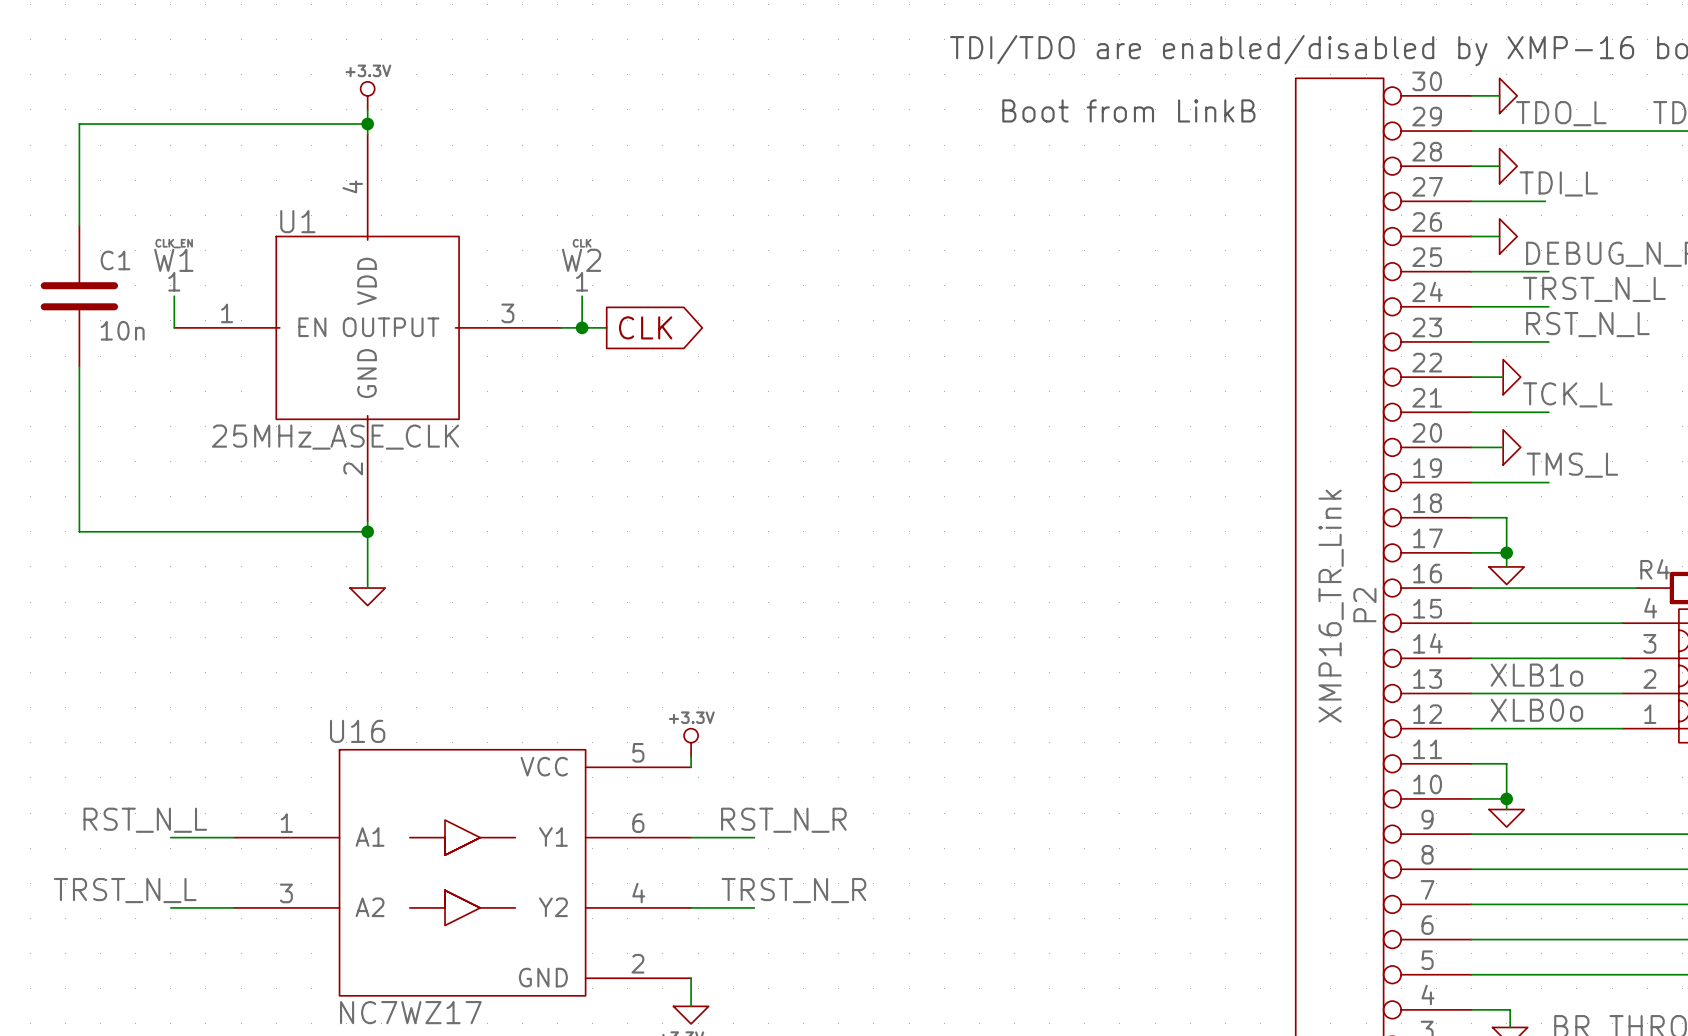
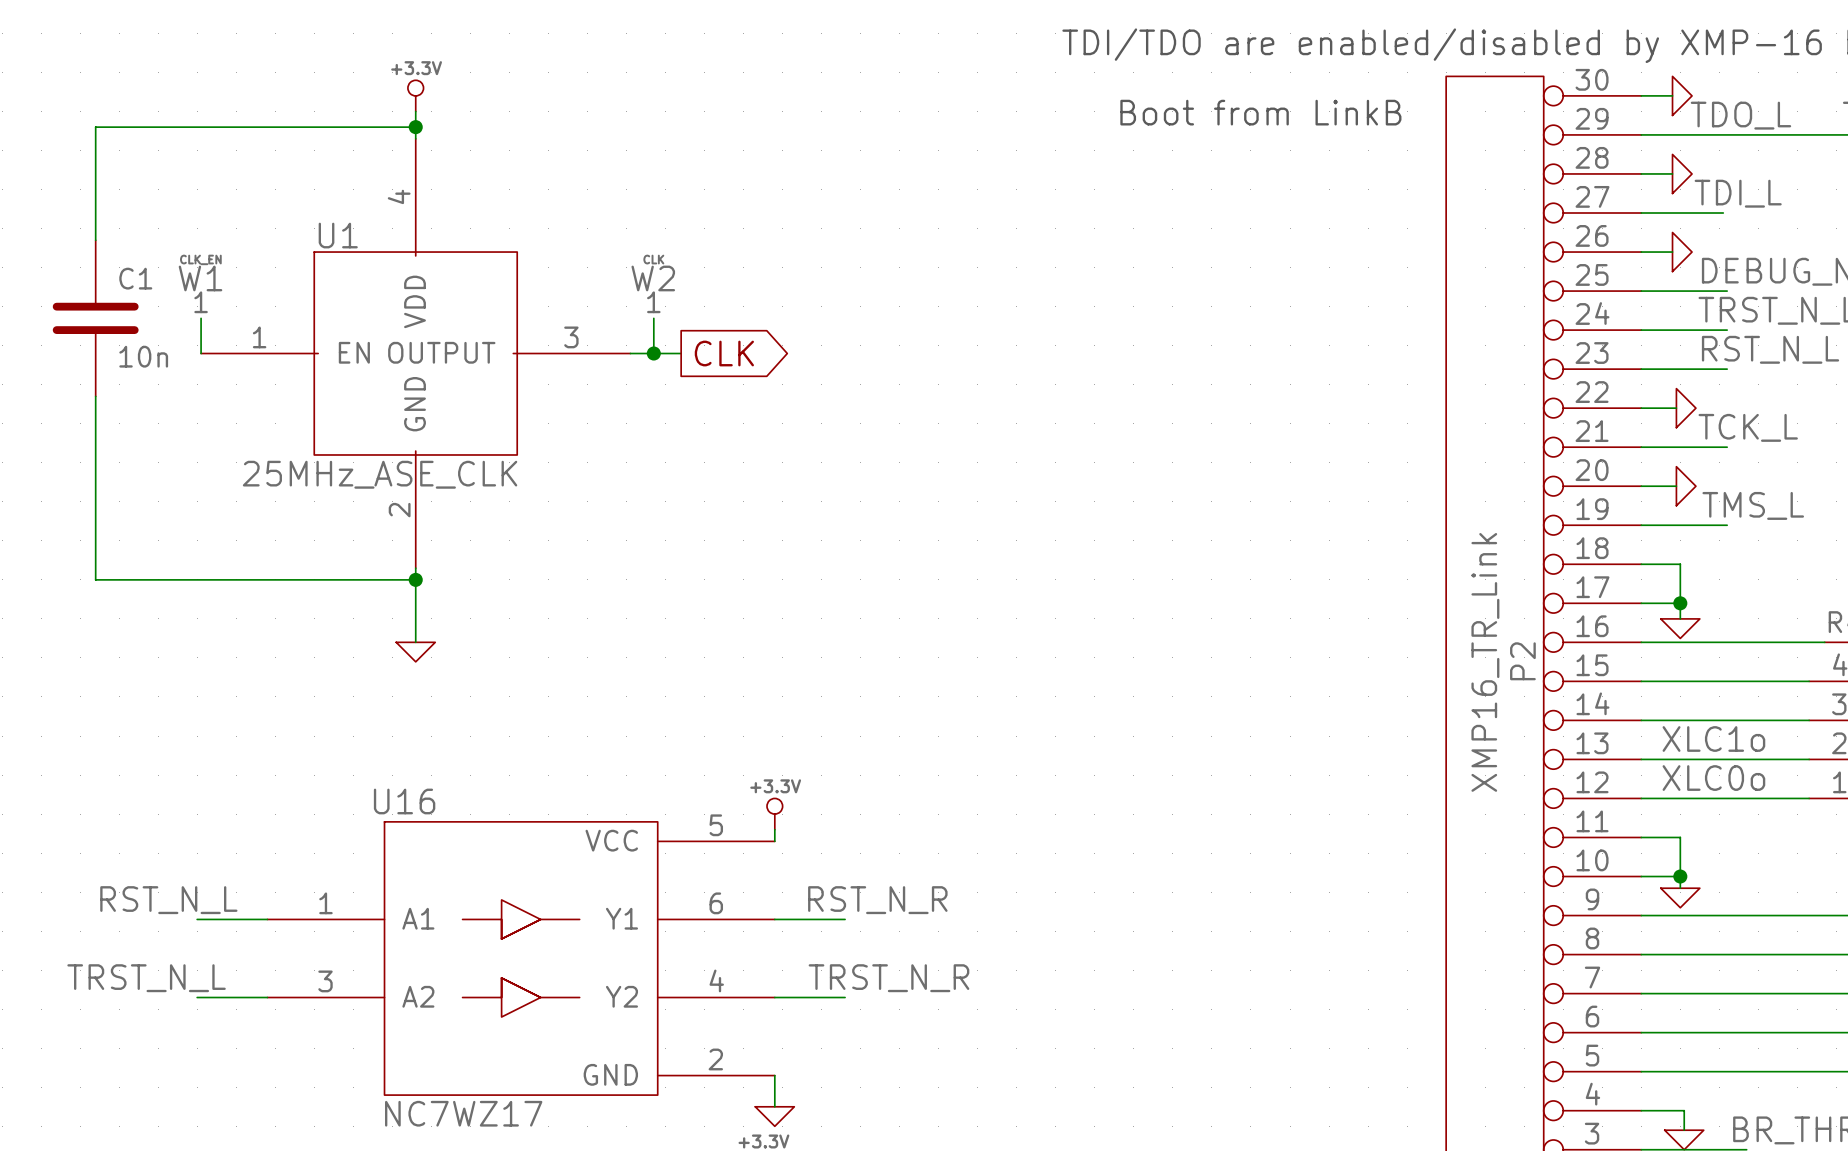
label: XLB1o (1536, 675) -> XLC1o (1713, 738)
label: XLB0o (1536, 710) -> XLC0o (1713, 778)

